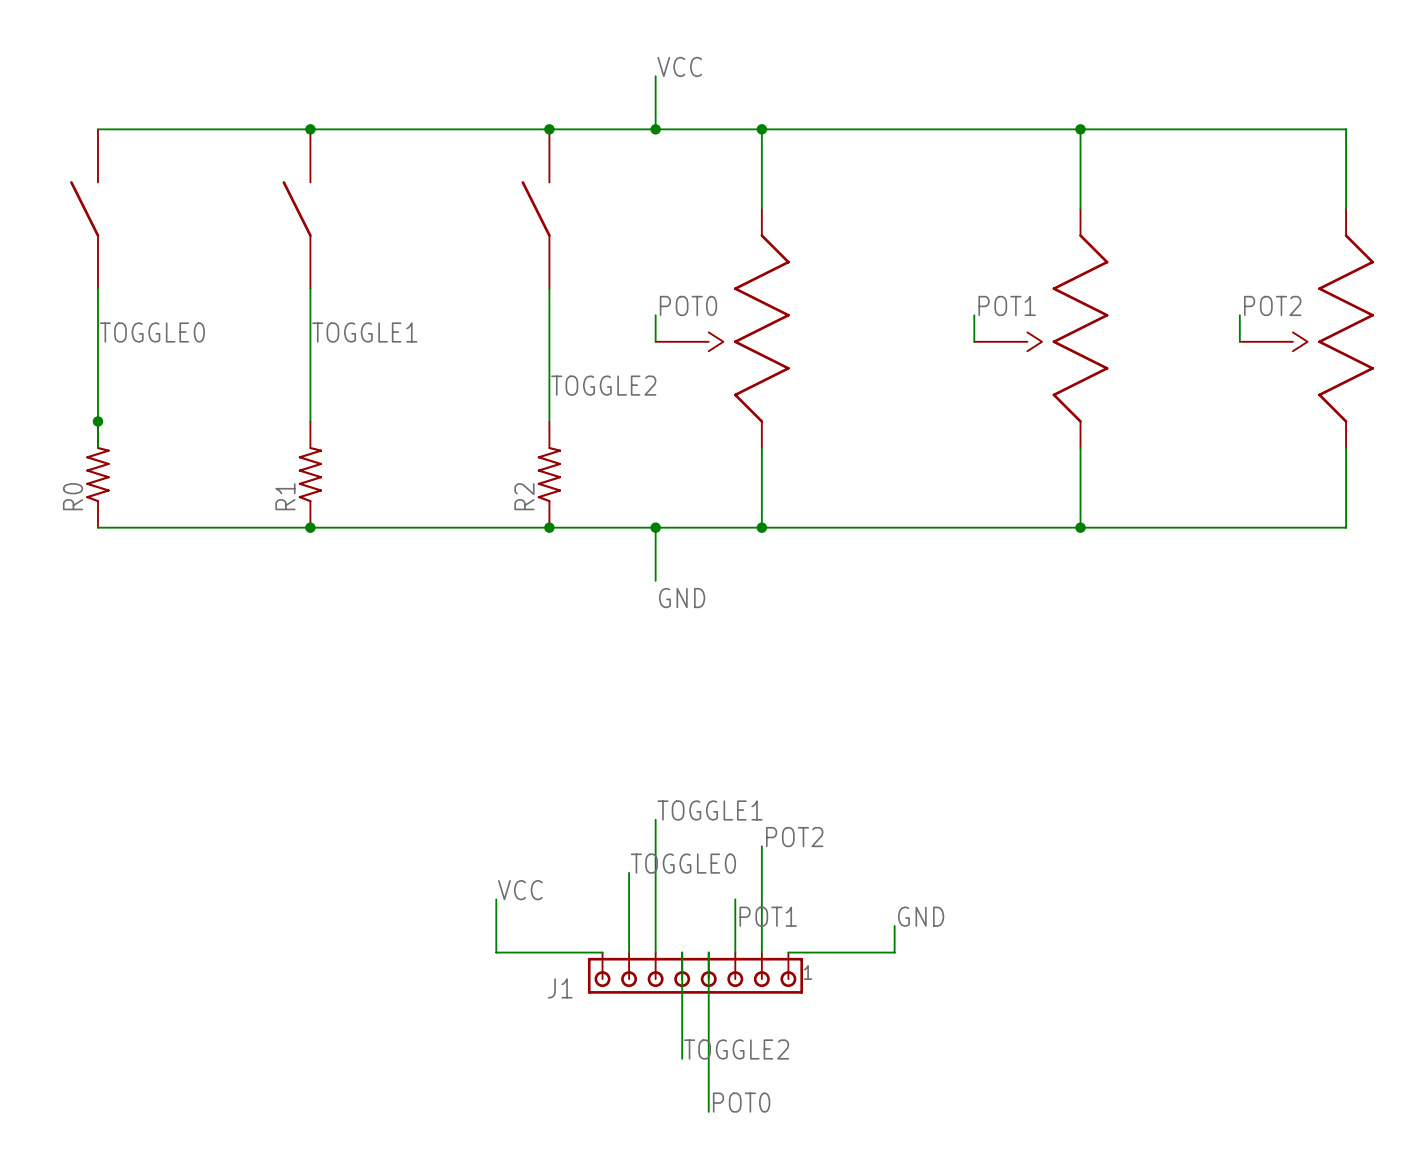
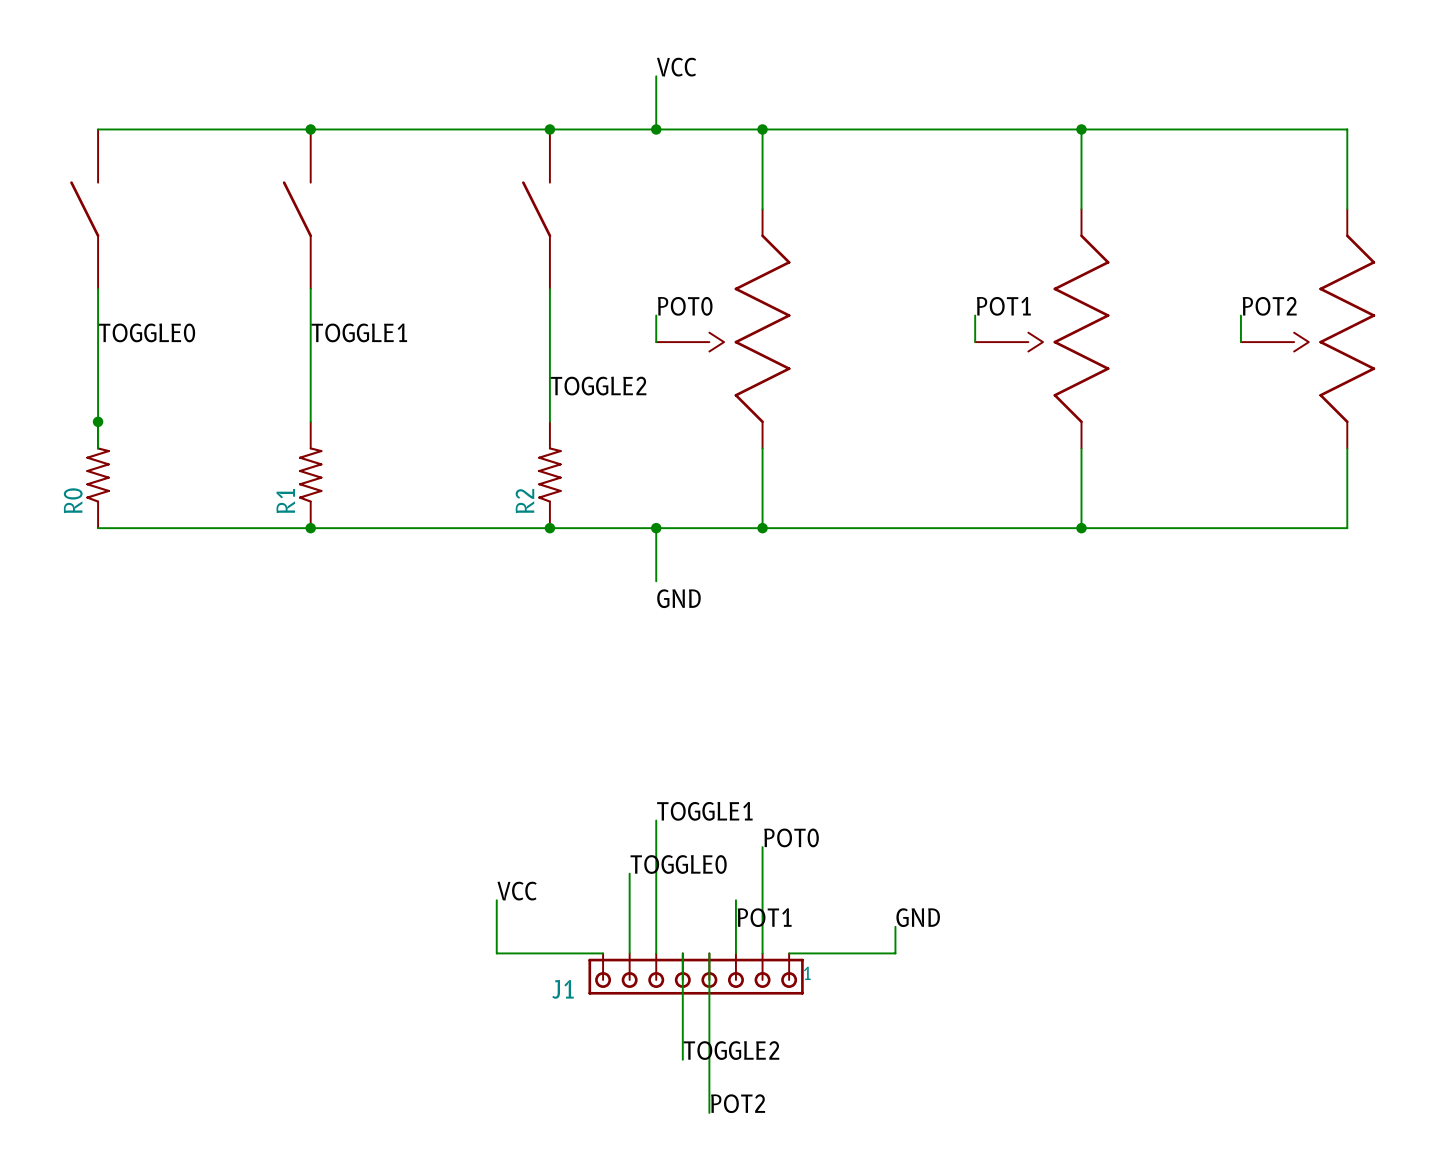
label: POT2 (794, 837) -> POT0 (791, 837)
label: POT0 (741, 1102) -> POT2 (738, 1103)

